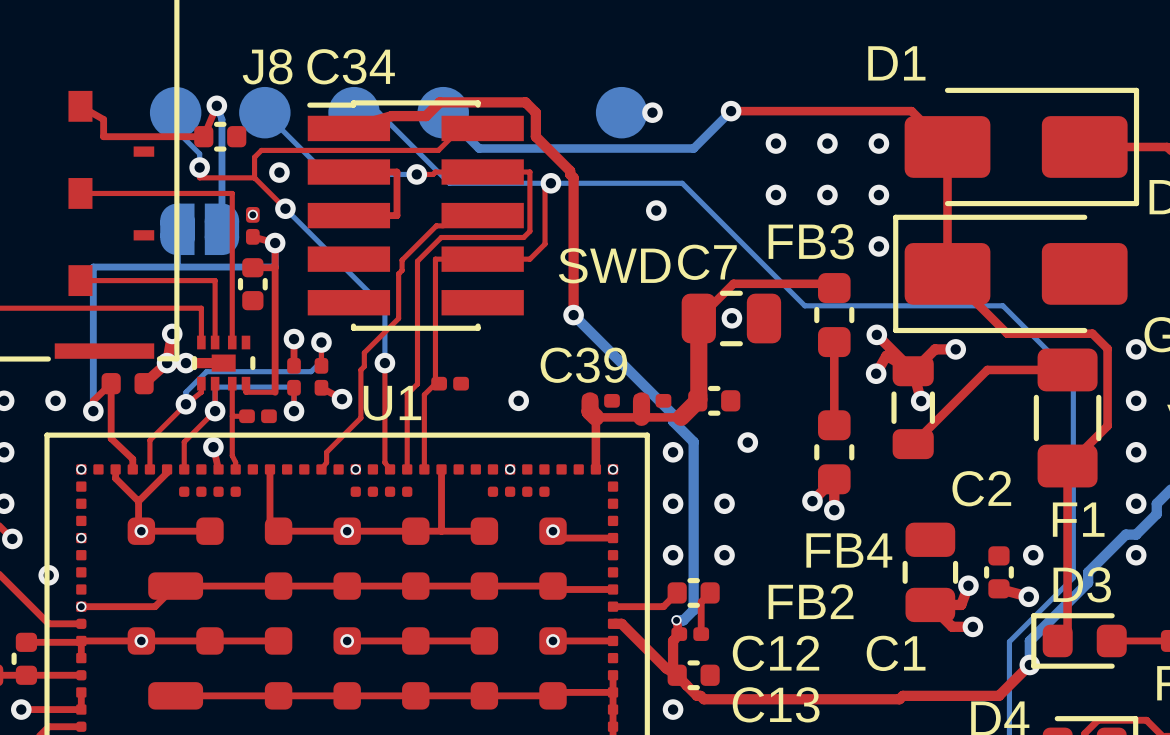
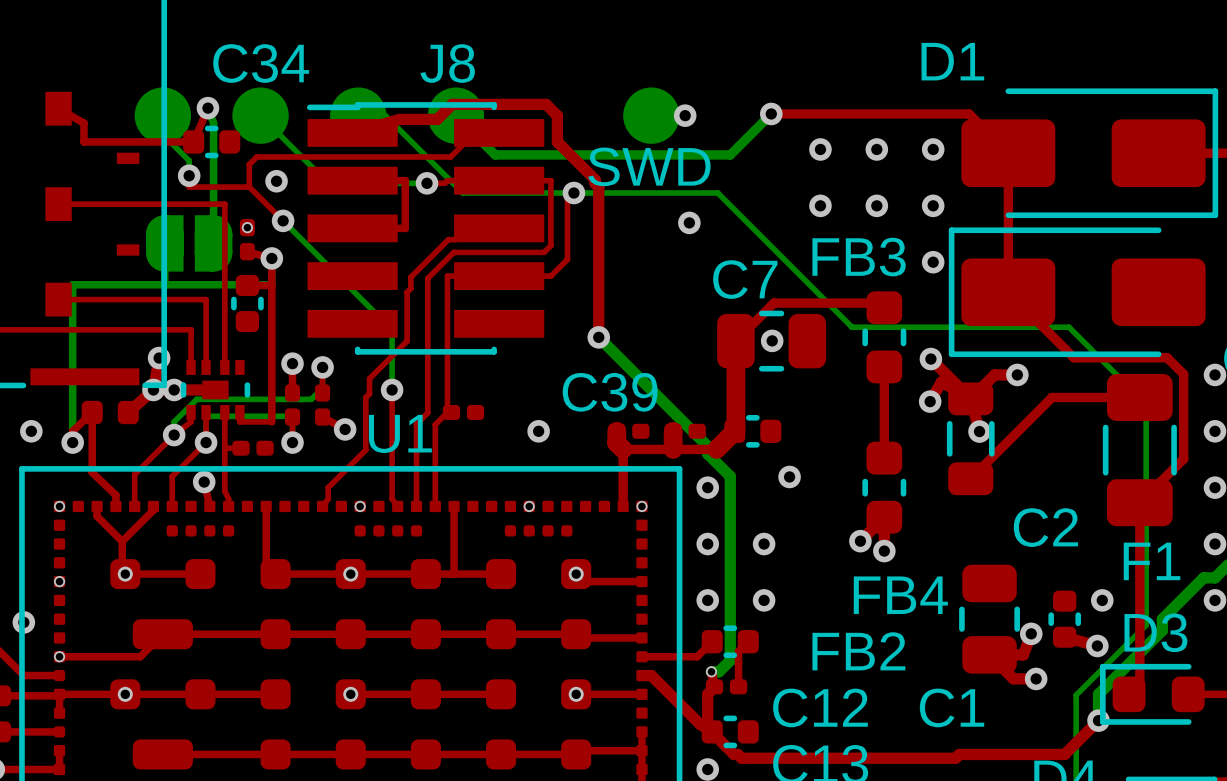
J8 name position: J8 (267, 66) -> J8 (447, 63)
C34 name position: C34 (351, 66) -> C34 (261, 63)
text position: SWD (614, 265) -> SWD (649, 166)

